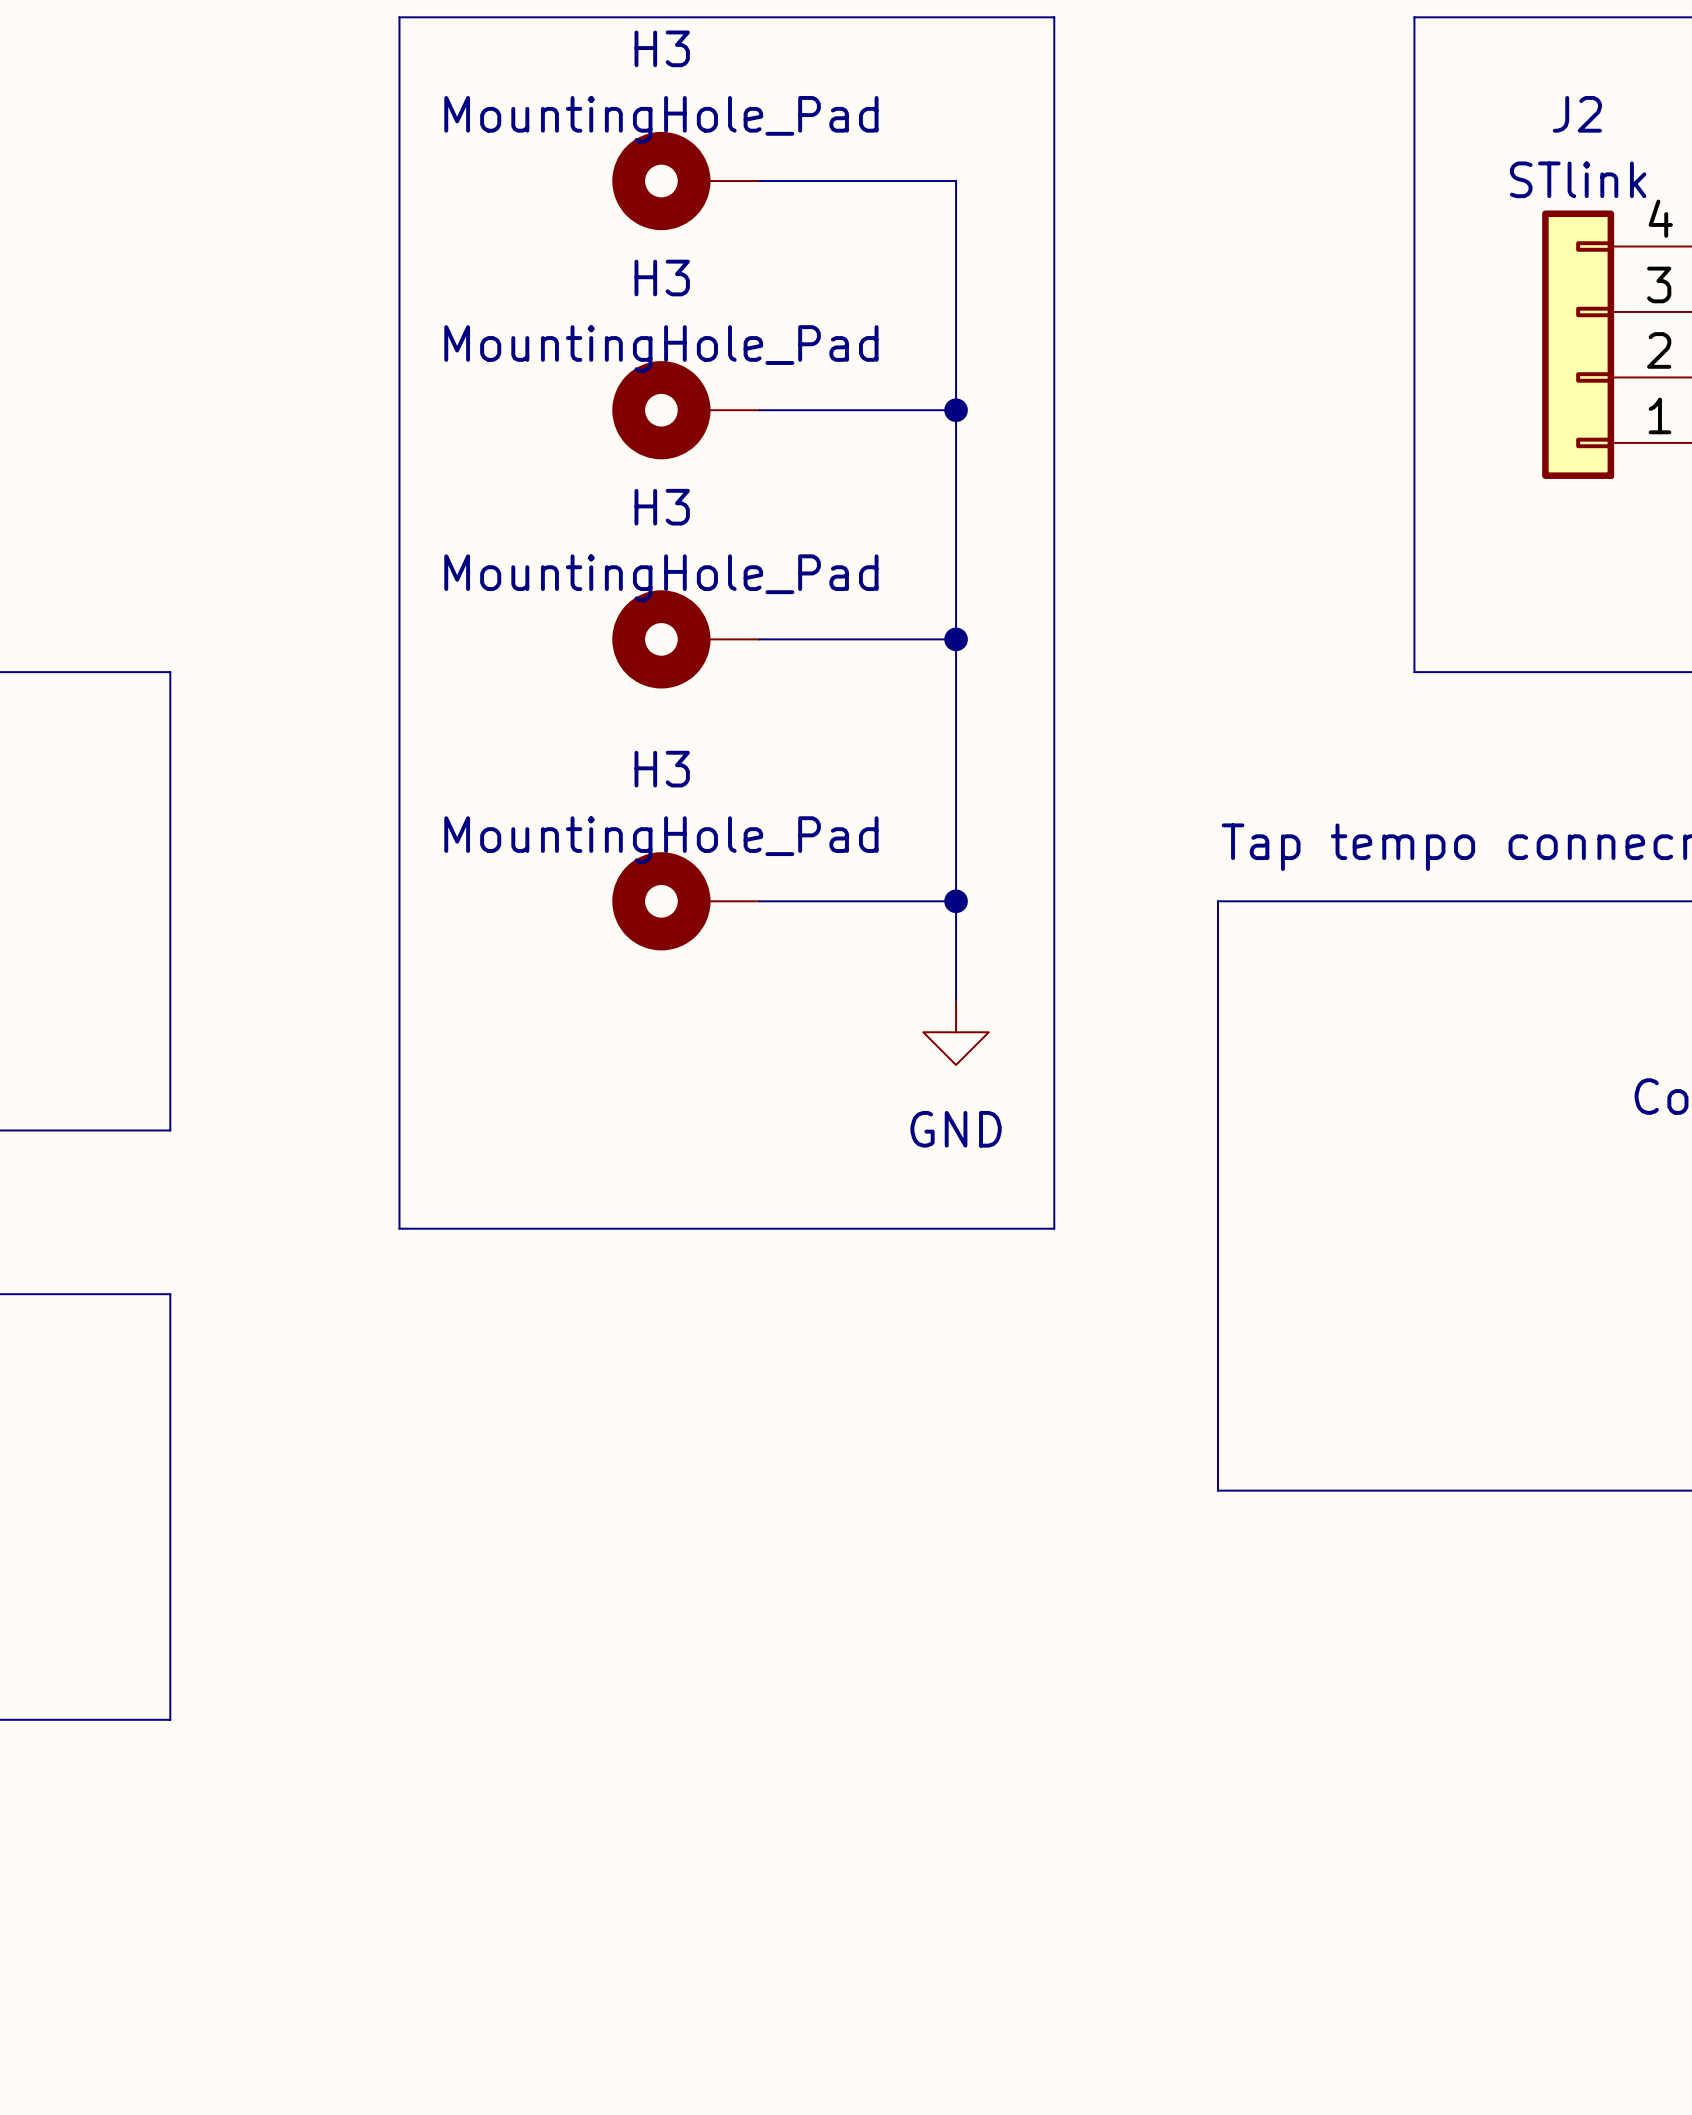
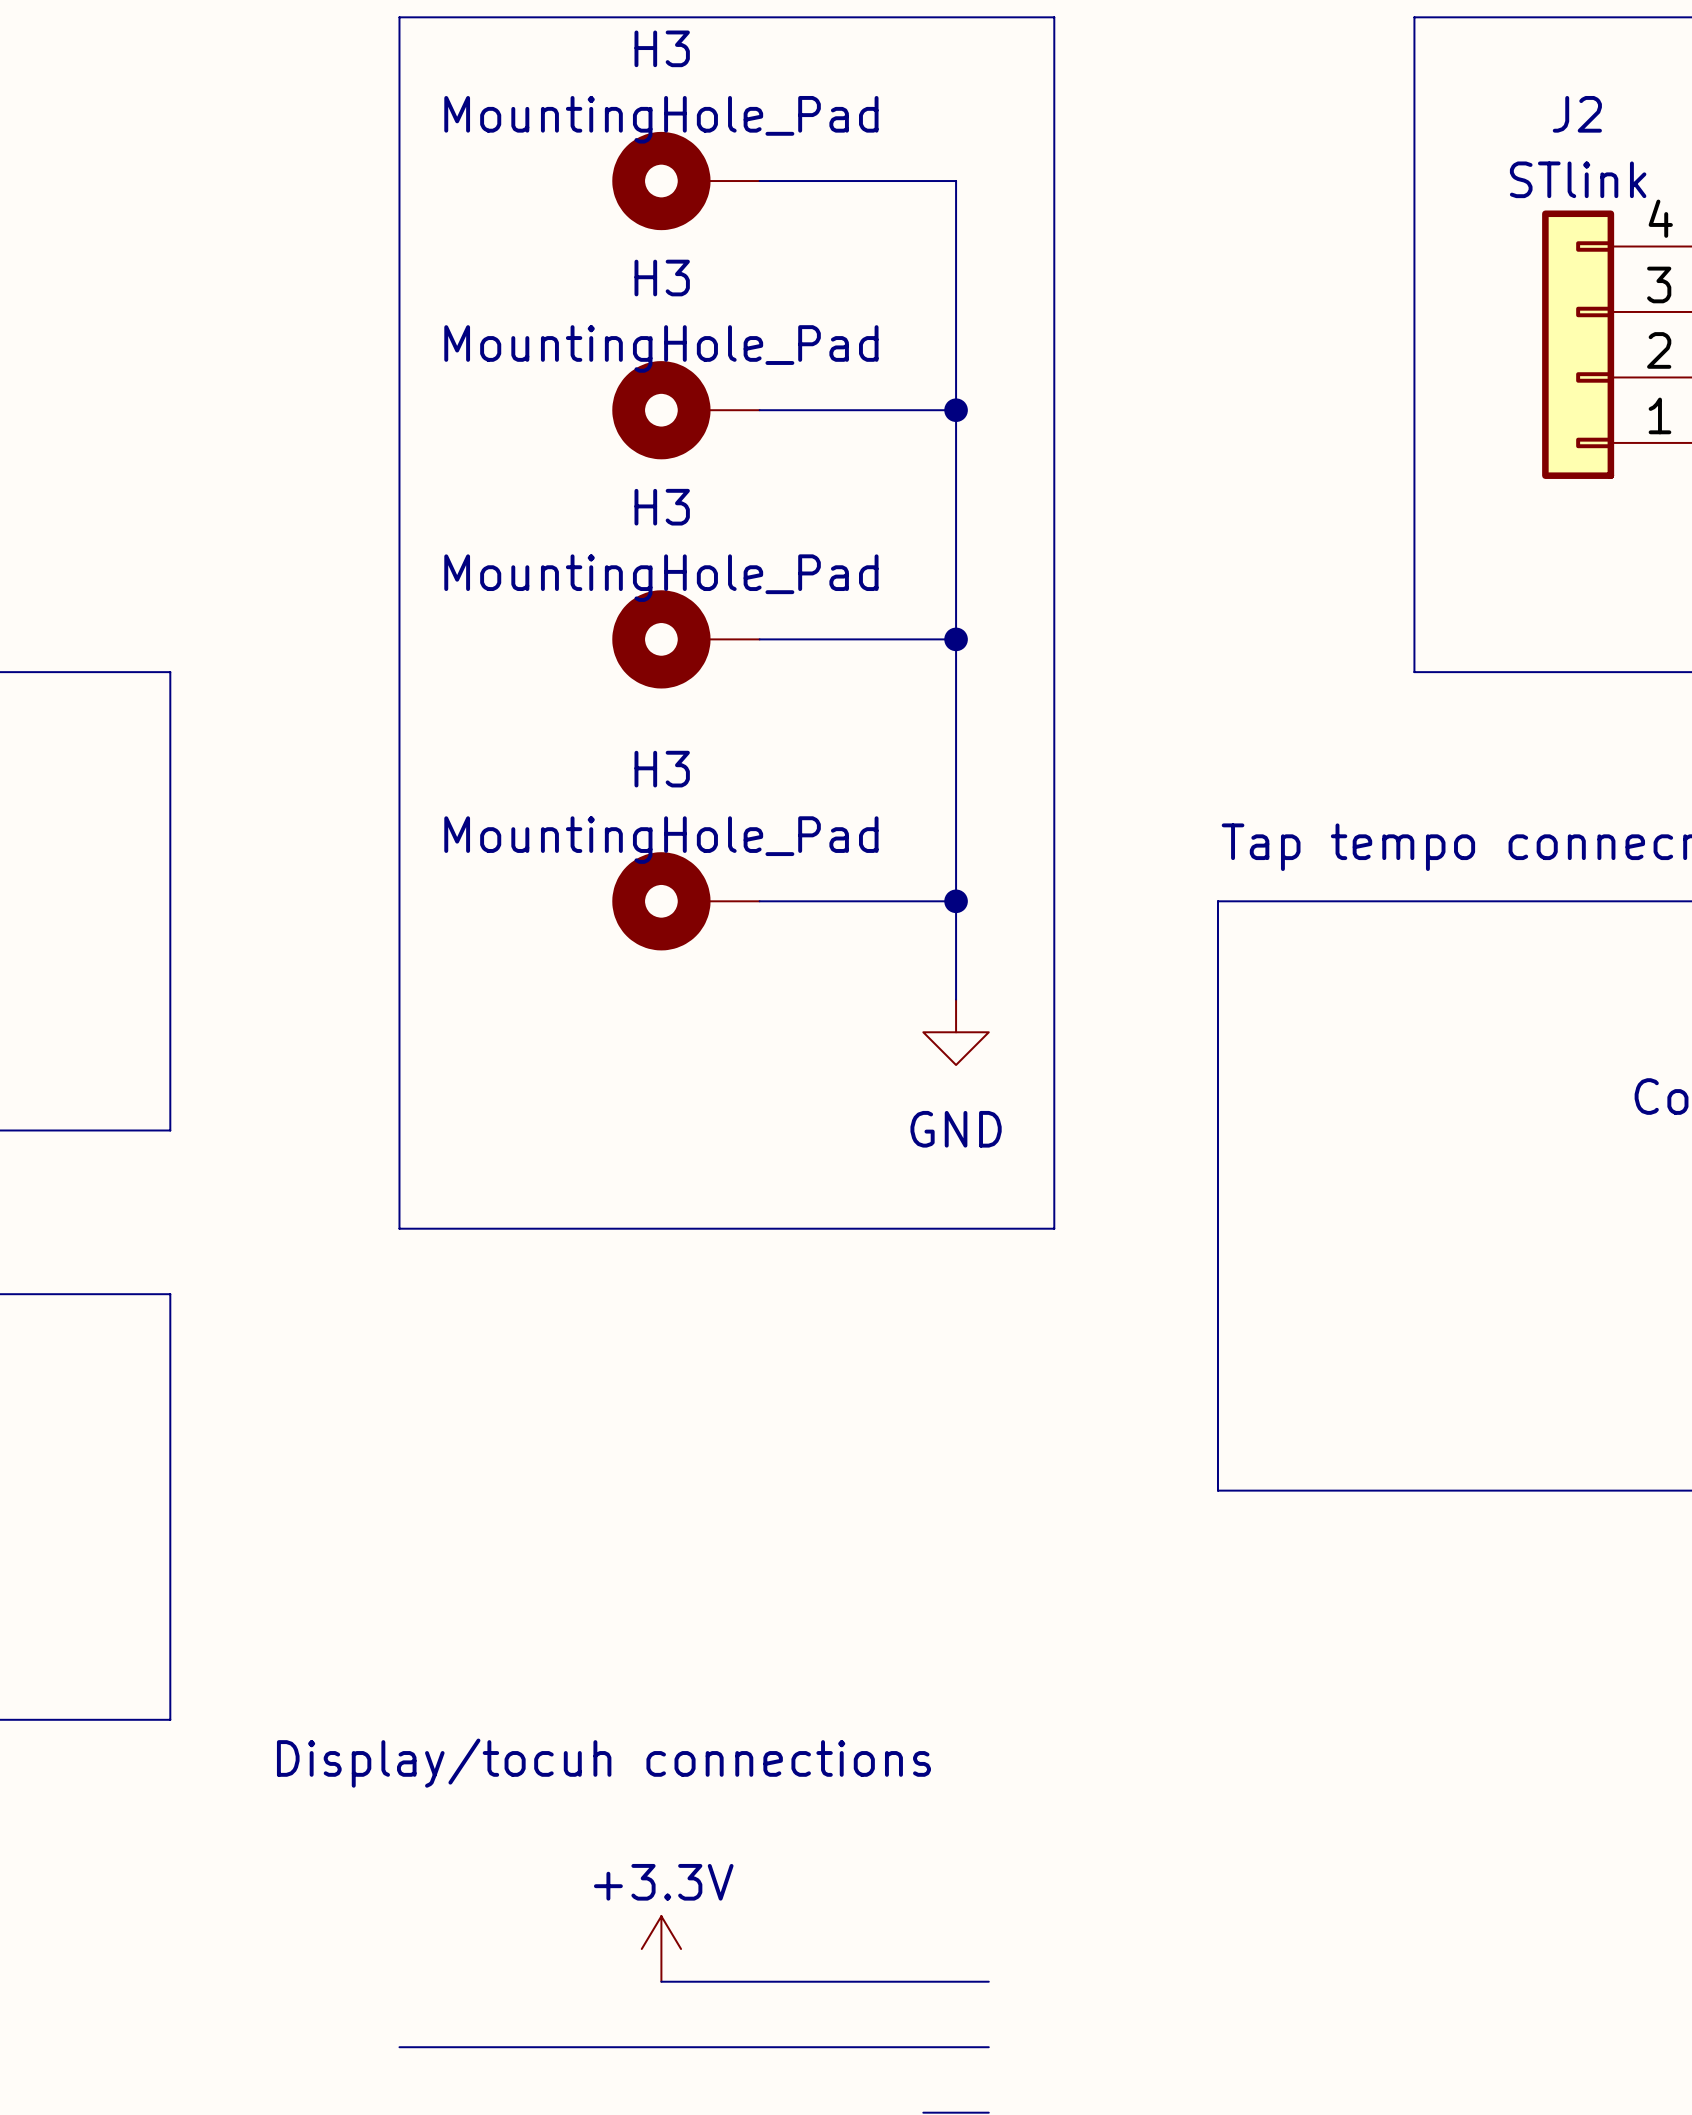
text: none -> Display/tocuh connections (603, 1763)
power symbol: none -> +3.3V (661, 1948)
wire: none -> (661, 1981) (988, 1981)
wire: none -> (399, 2047) (988, 2047)
wire: none -> (923, 2112) (988, 2112)

